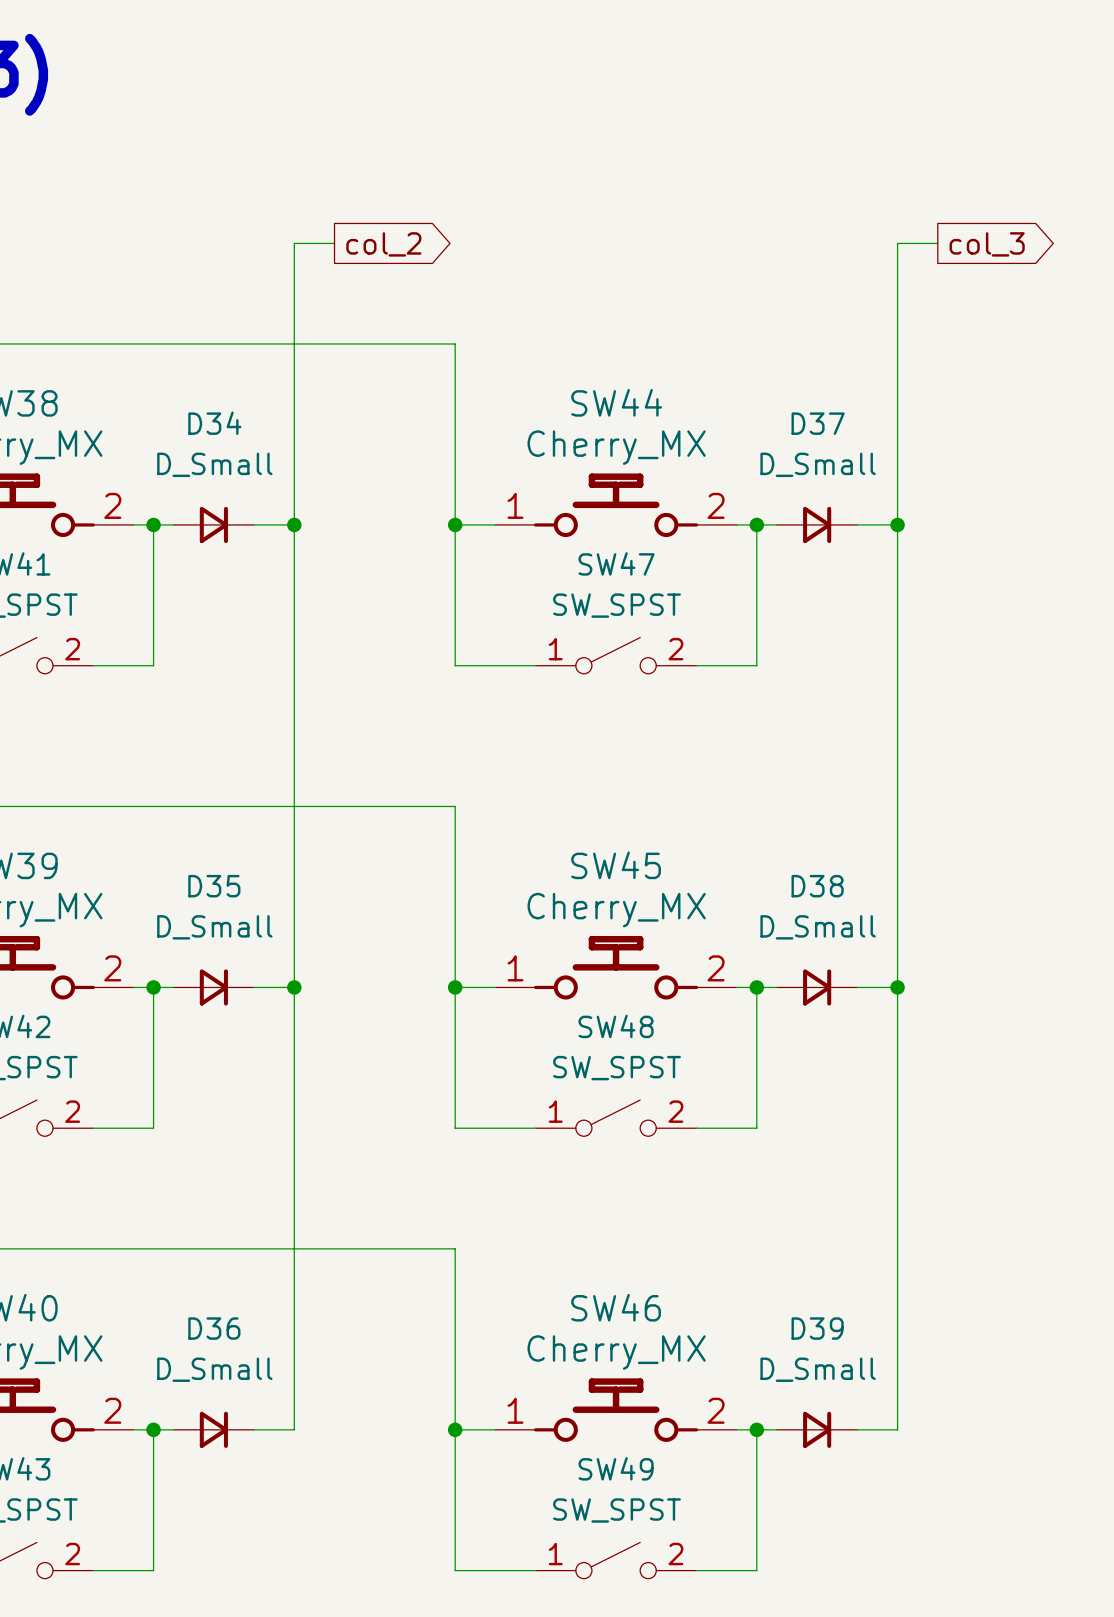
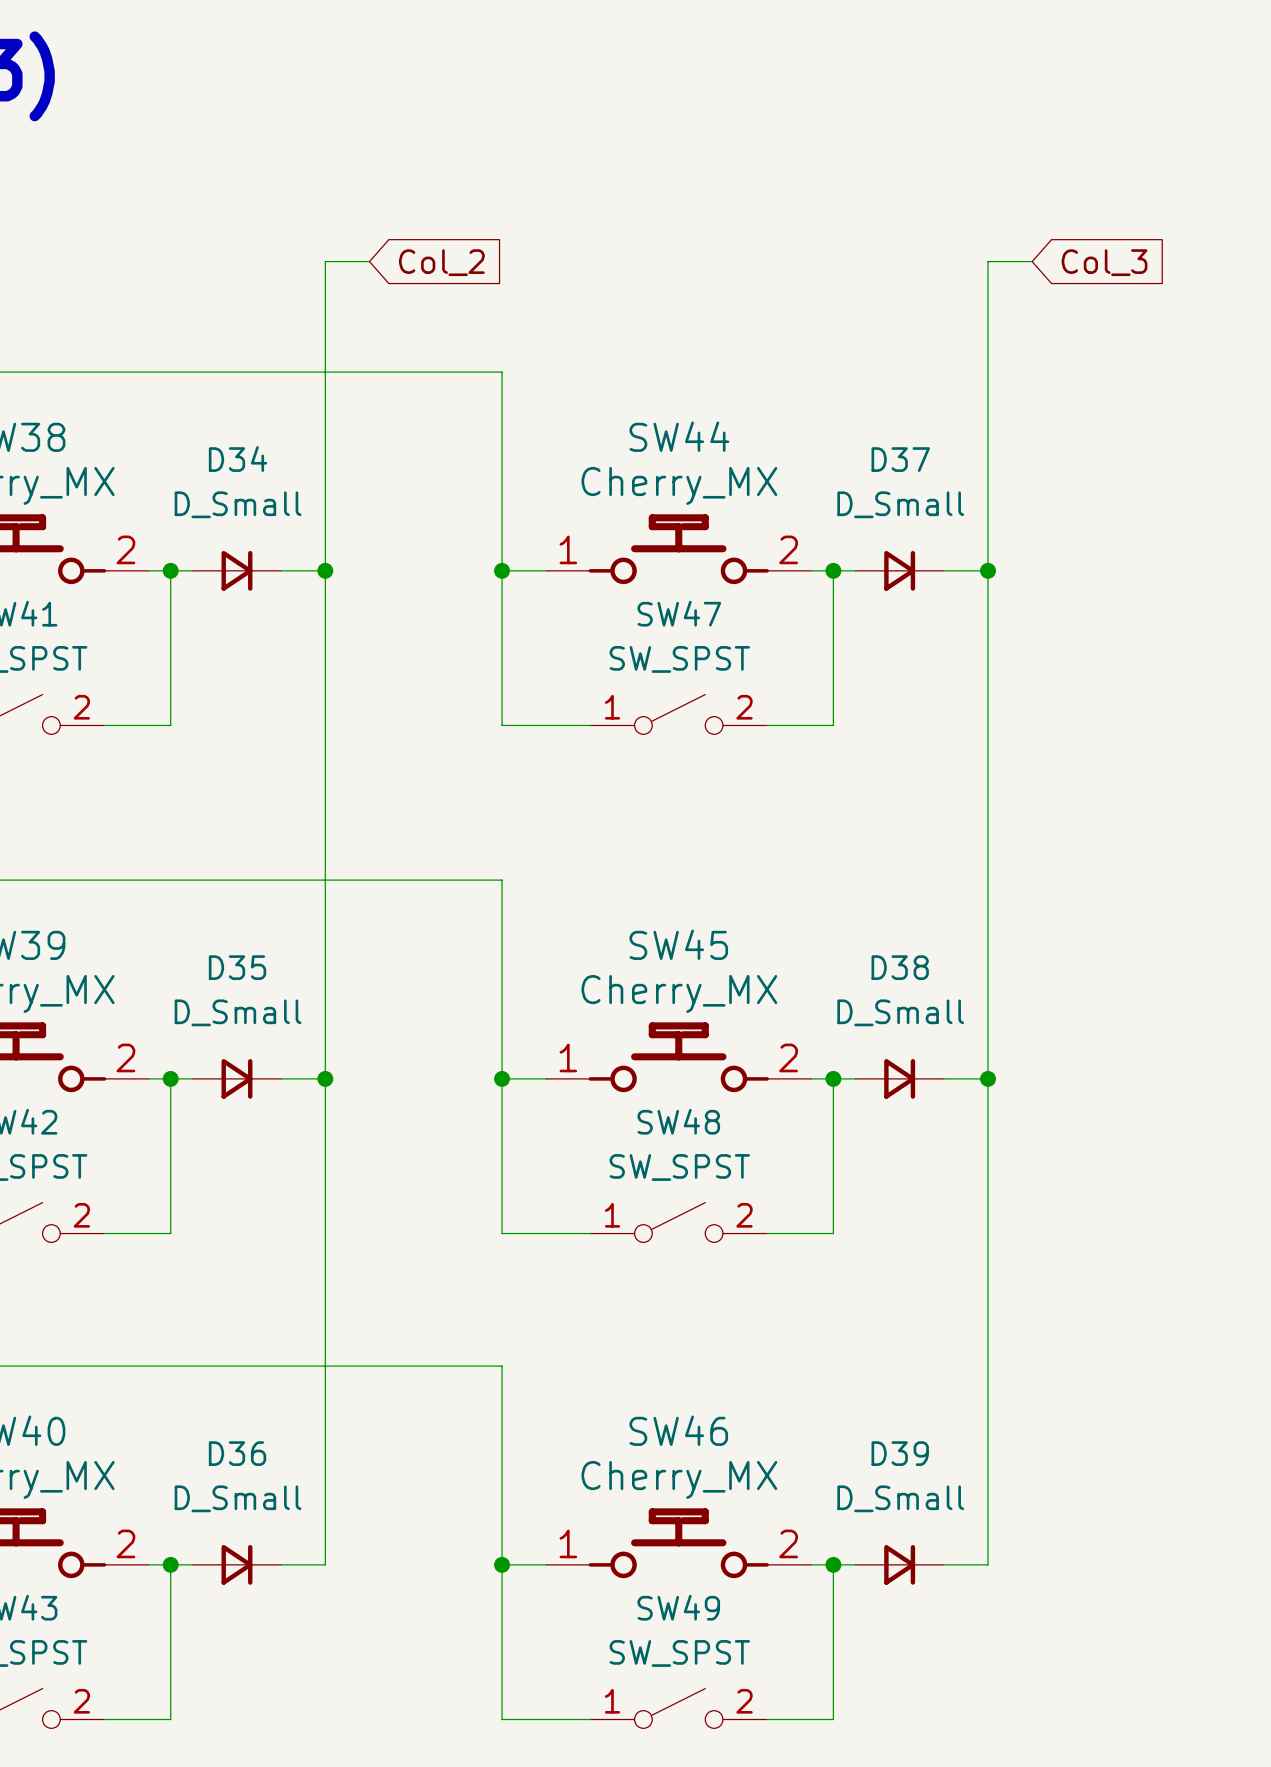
global label shape: output (383, 244) -> input (441, 262)
global label: col_2 (383, 244) -> Col_2 (441, 262)
global label shape: output (987, 244) -> input (1104, 262)
global label: col_3 (987, 244) -> Col_3 (1104, 262)

